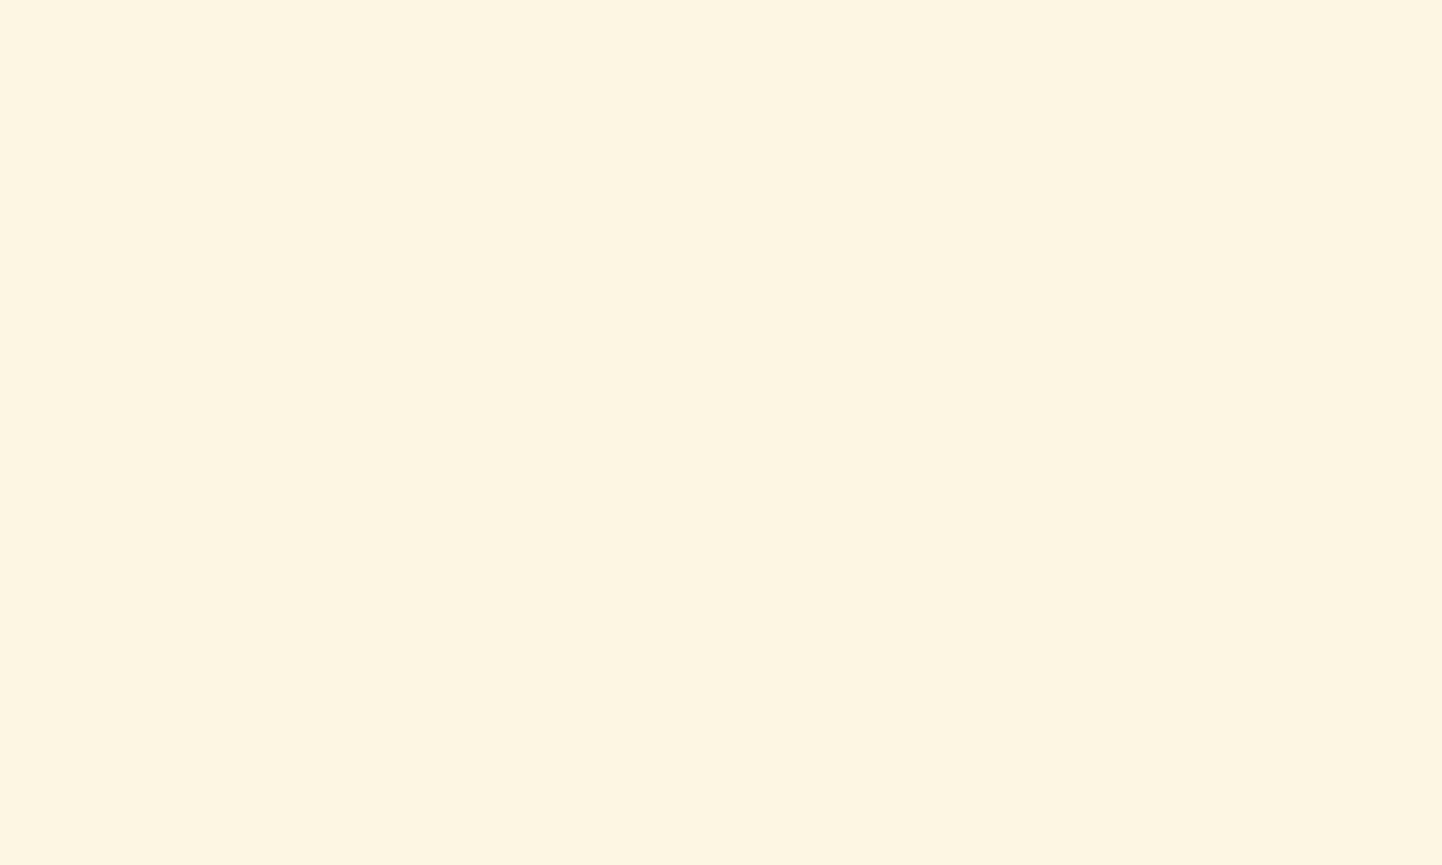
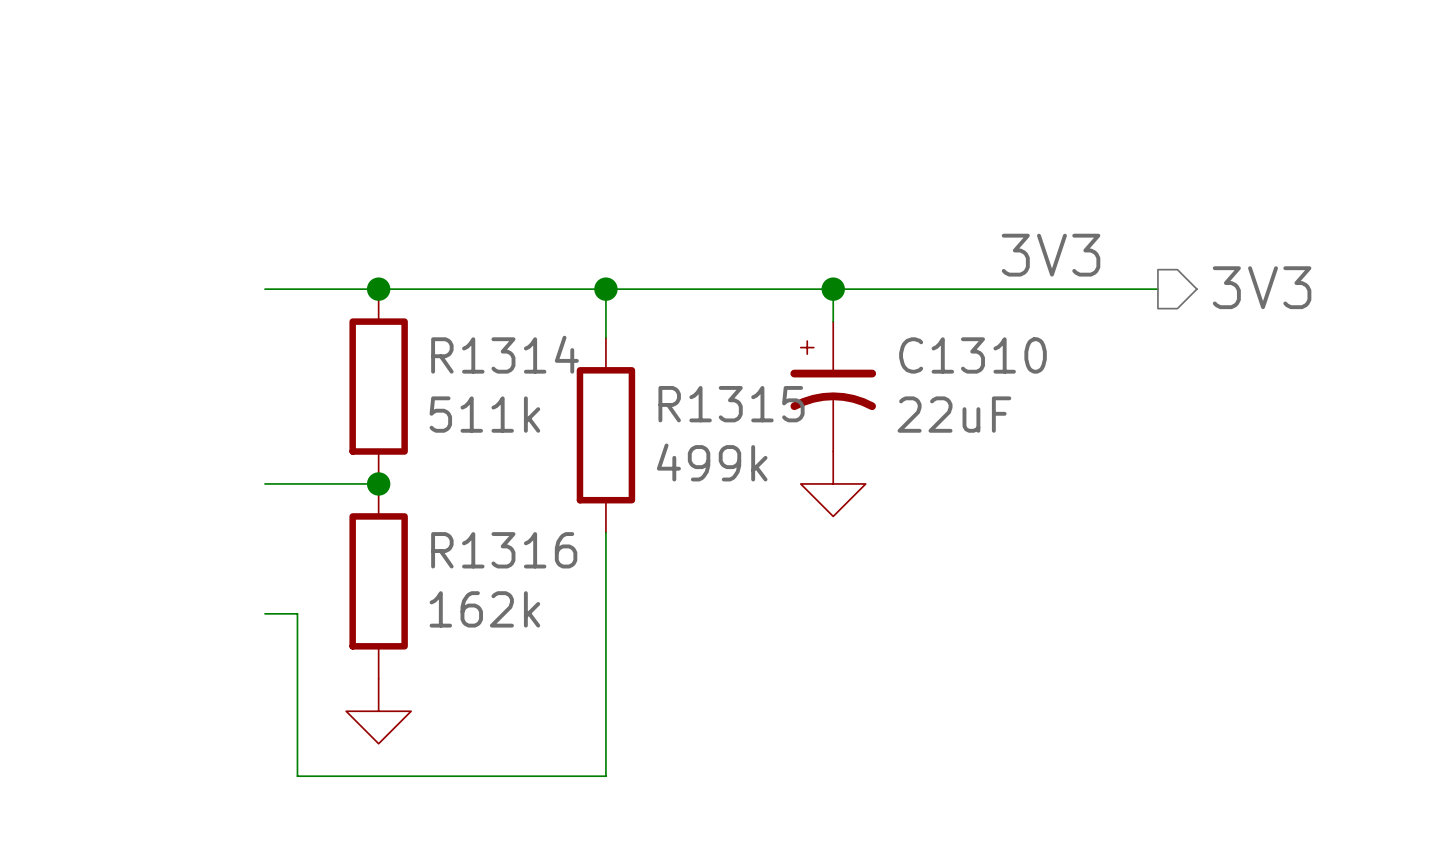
label: none -> 3V3 (1051, 255)
hierarchical label: none -> 3V3 (1262, 287)
wire: none -> (264, 289) (1157, 289)
junction: none -> (378, 289)
wire: none -> (605, 289) (605, 337)
junction: none -> (605, 289)
wire: none -> (833, 289) (833, 321)
junction: none -> (833, 289)
R1314: none -> 511k (378, 386)
C1310: none -> 22uF (833, 386)
R1315: none -> 499k (605, 435)
wire: none -> (264, 483) (378, 483)
junction: none -> (378, 483)
power symbol: none -> (833, 483)
wire: none -> (605, 532) (605, 776) (297, 776) (297, 613) (264, 613)
R1316: none -> 162k (378, 581)
power symbol: none -> (378, 711)

